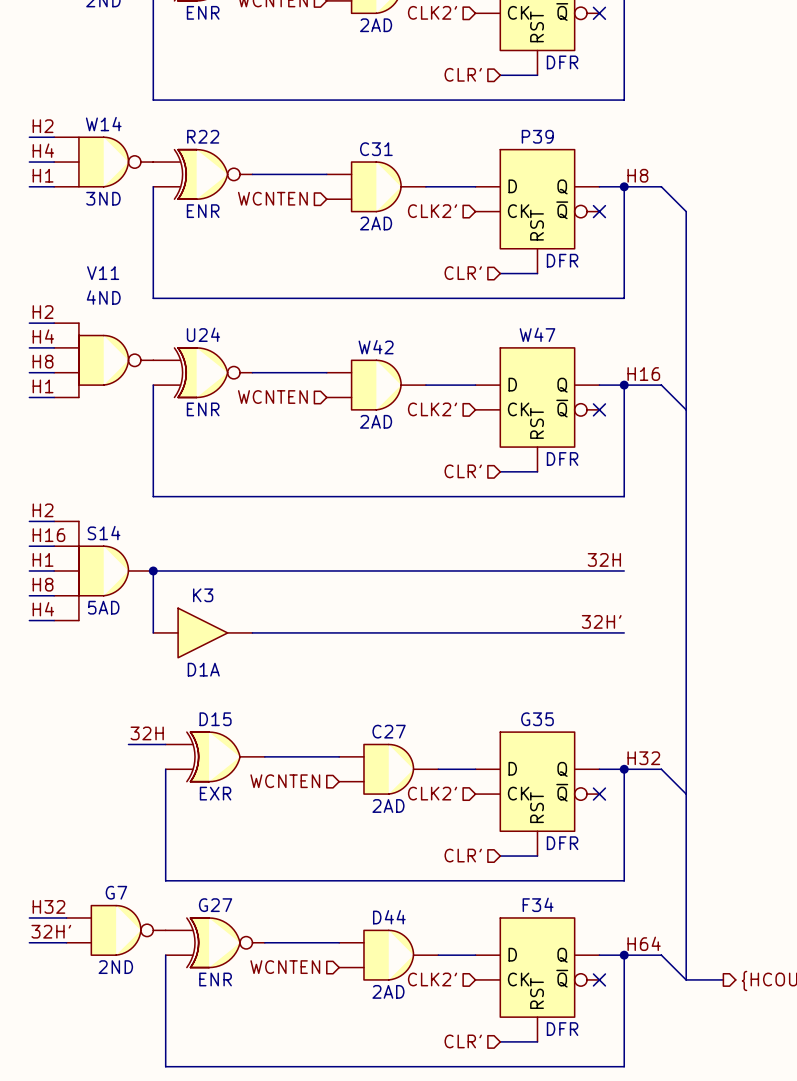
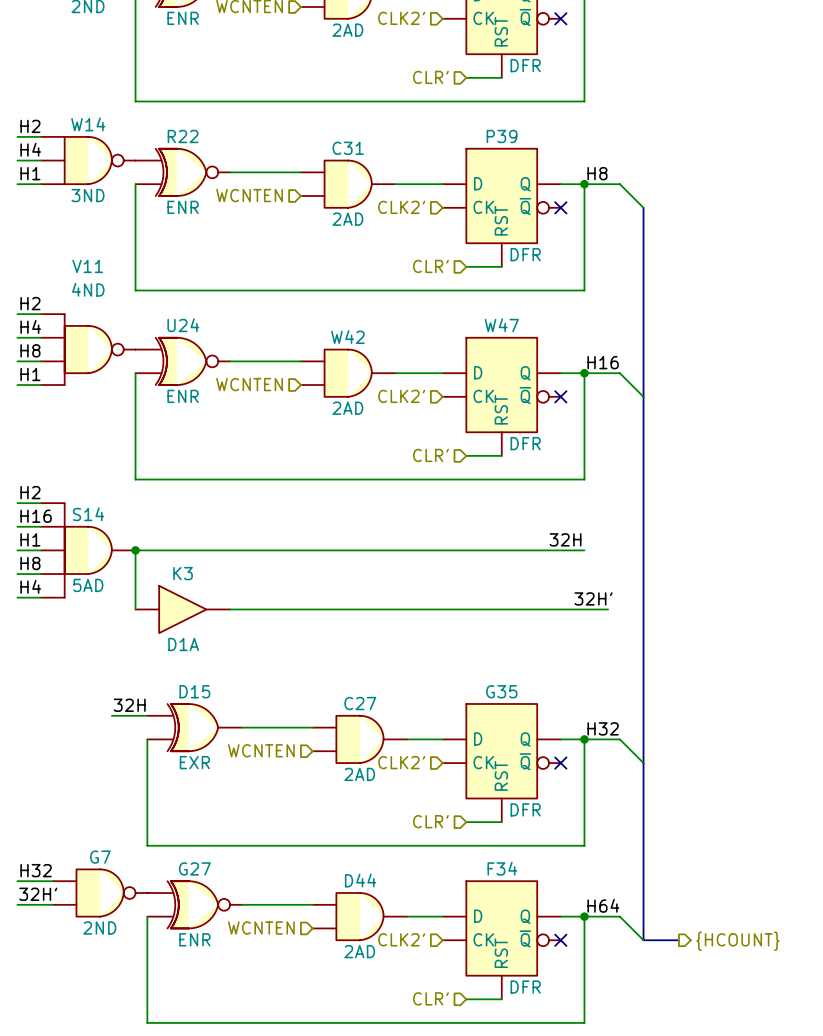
label position: 32H' (601, 621) -> 32H' (593, 598)
wire: none -> (584, 609) (608, 609)

